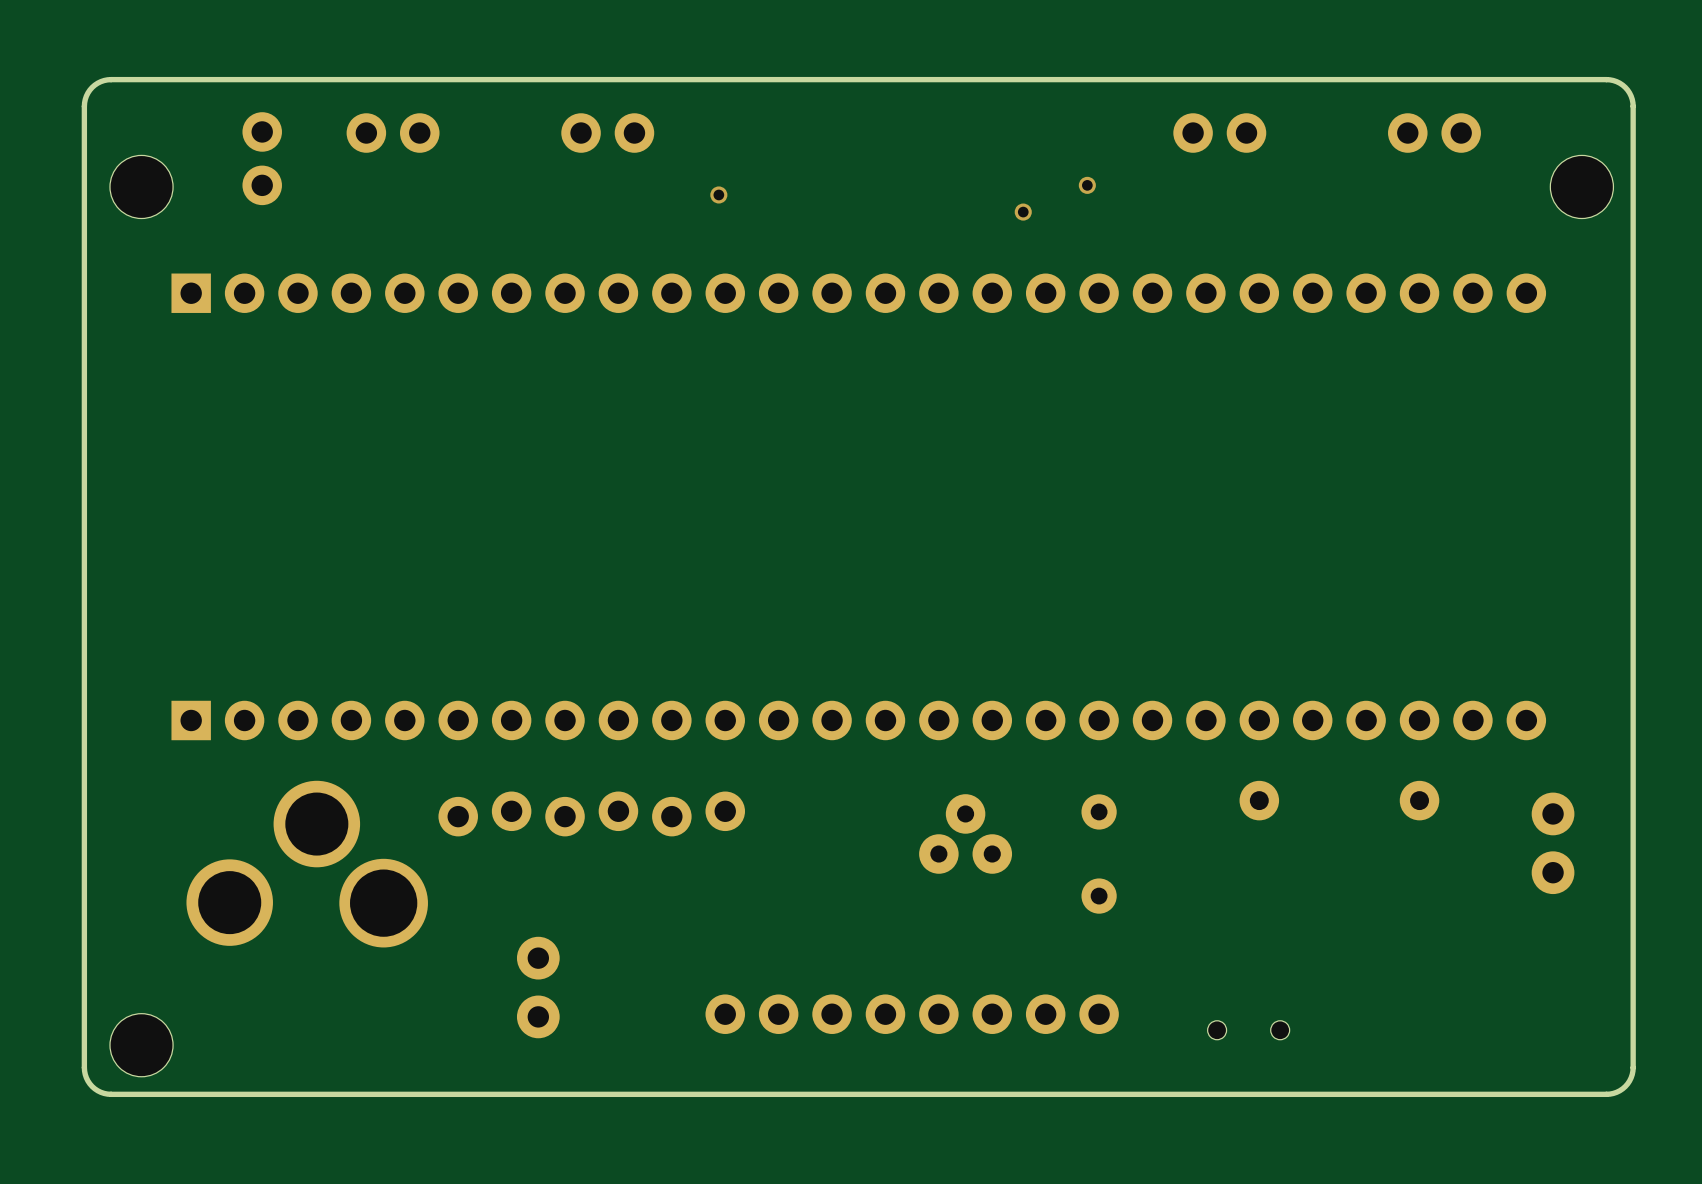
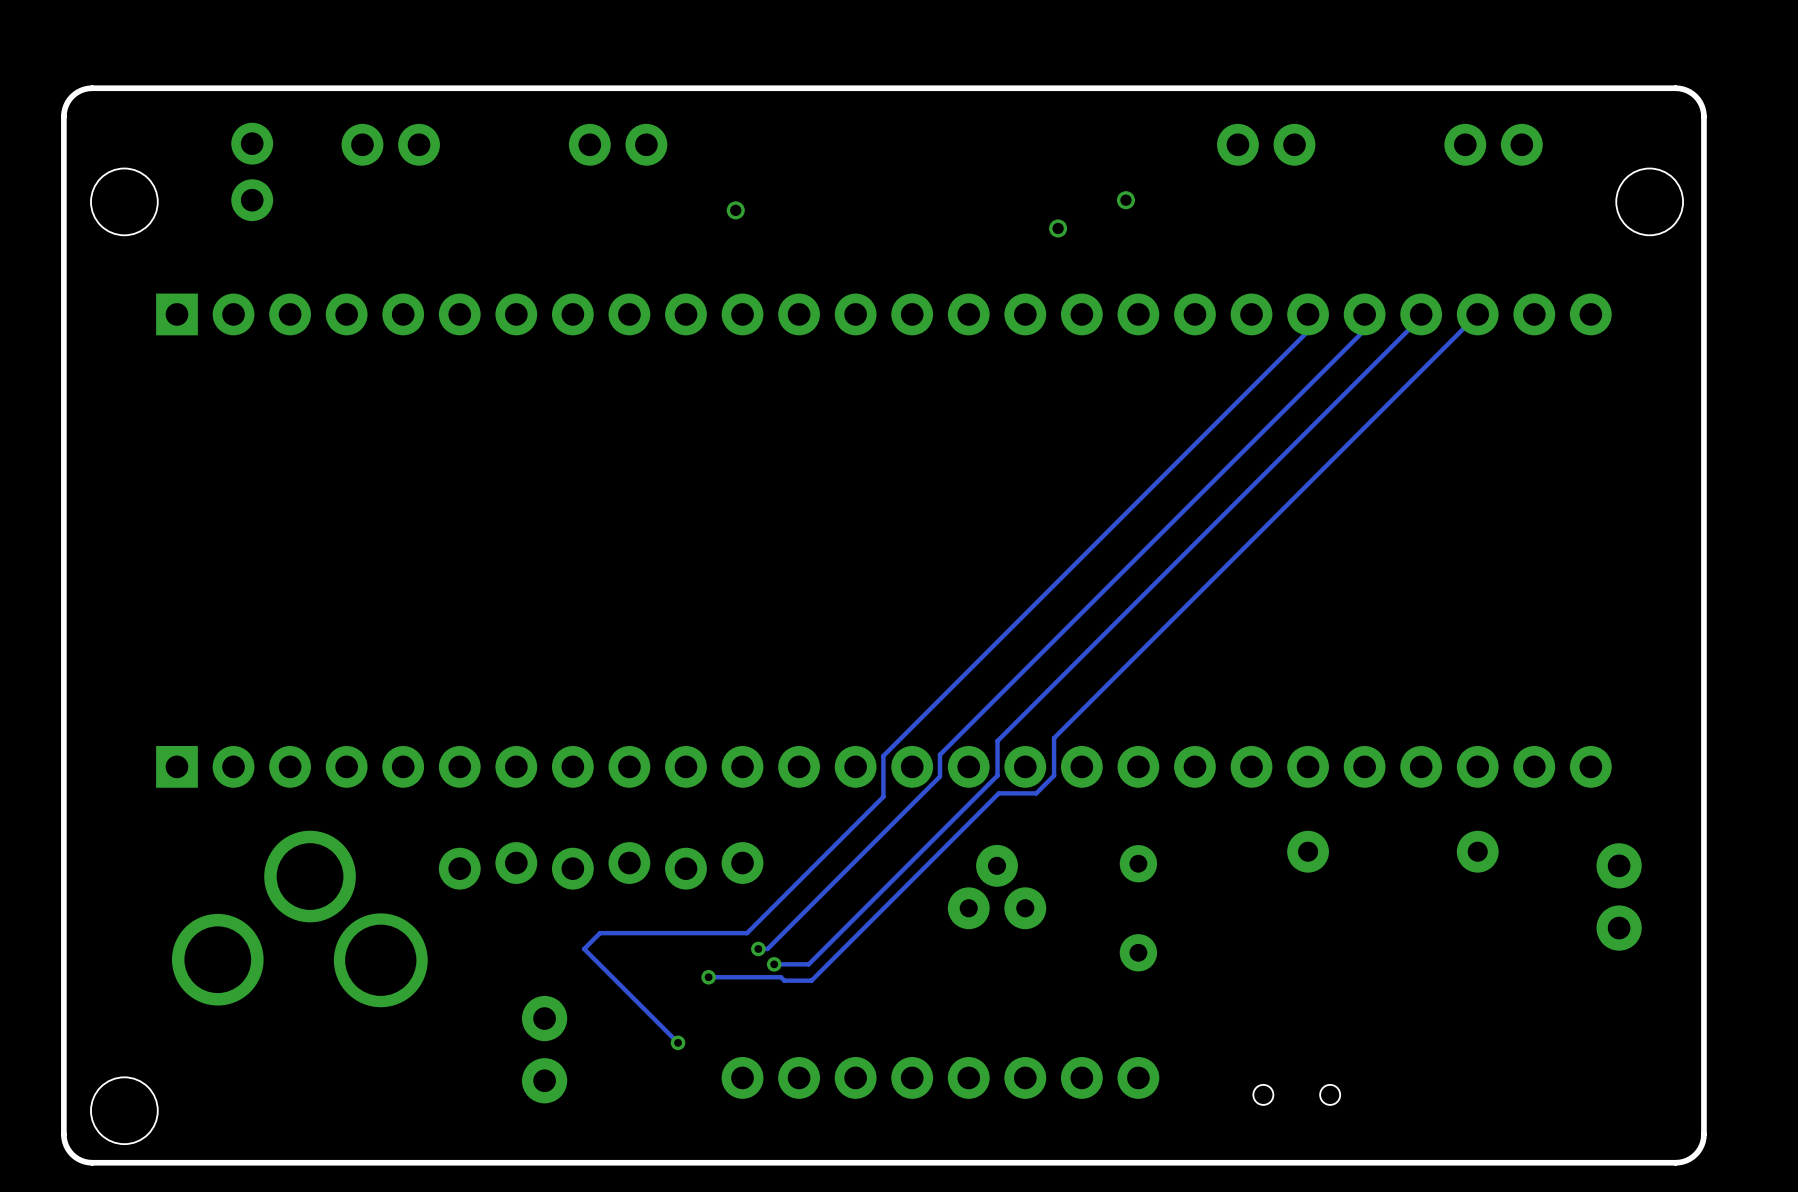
track: none -> (1308, 314) (1308, 331) (883, 755) (883, 796) (747, 933) (600, 933) (584, 948) (678, 1042)
track: none -> (1364, 314) (1364, 330) (939, 754) (939, 776) (767, 948) (758, 948)
track: none -> (1421, 314) (1421, 317) (997, 741) (997, 775) (808, 964) (774, 964)
track: none -> (1477, 314) (1054, 738) (1054, 775) (1036, 793) (998, 793) (811, 980) (784, 980) (780, 977) (708, 977)
via: none -> (758, 948)
via: none -> (774, 964)
via: none -> (708, 977)
via: none -> (678, 1042)

